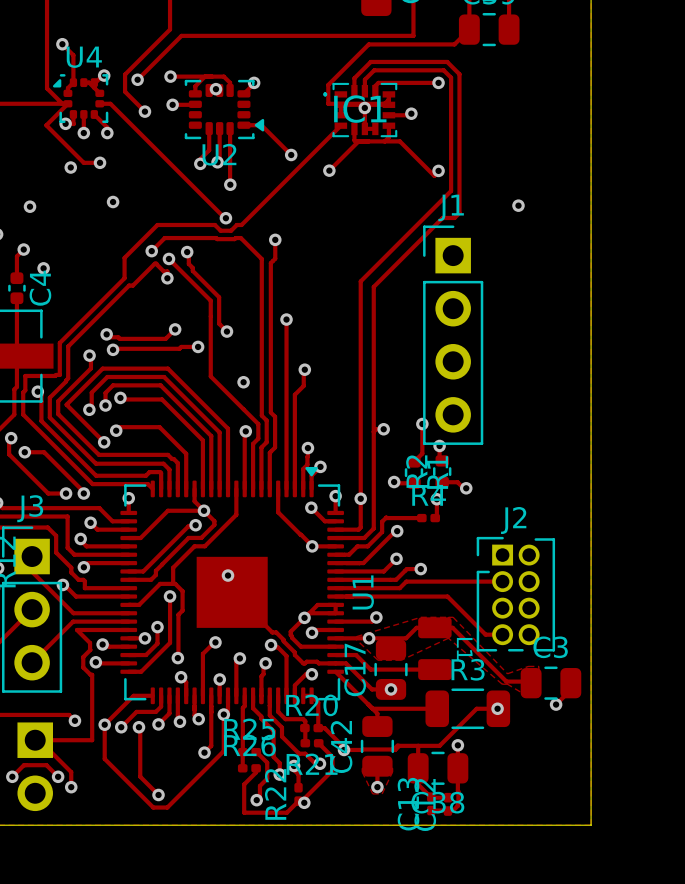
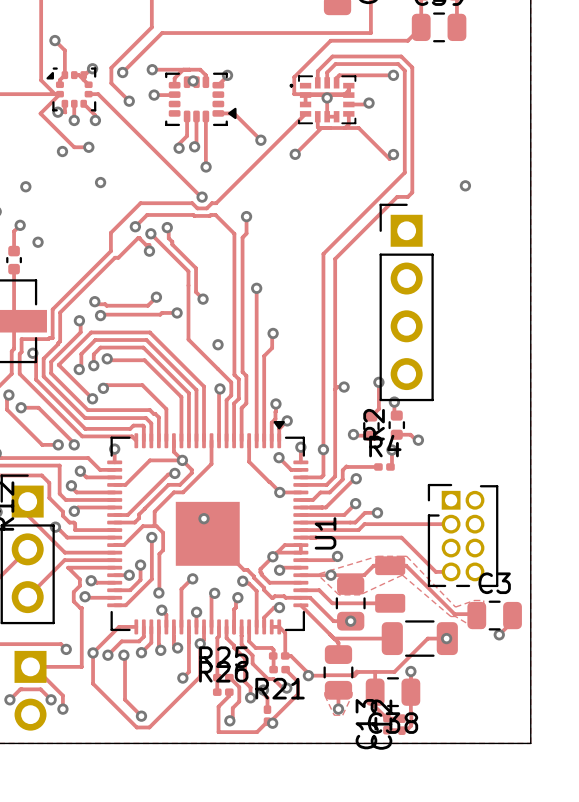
U4 name: U4 (84, 57) -> none
IC1 name: IC1 (360, 109) -> none
U2 name: U2 (219, 154) -> none
J1 name: J1 (451, 207) -> none
C4 name: C4 (40, 288) -> none
R1 name: R1 (437, 472) -> none
J3 name: J3 (30, 508) -> none
J2 name: J2 (513, 520) -> none
L1 name: L1 (464, 648) -> none
R3 name: R3 (468, 669) -> none
C17 name: C17 (355, 670) -> none
R20 name: R20 (312, 705) -> none
C42 name: C42 (341, 747) -> none
R22 name: R22 (275, 794) -> none

